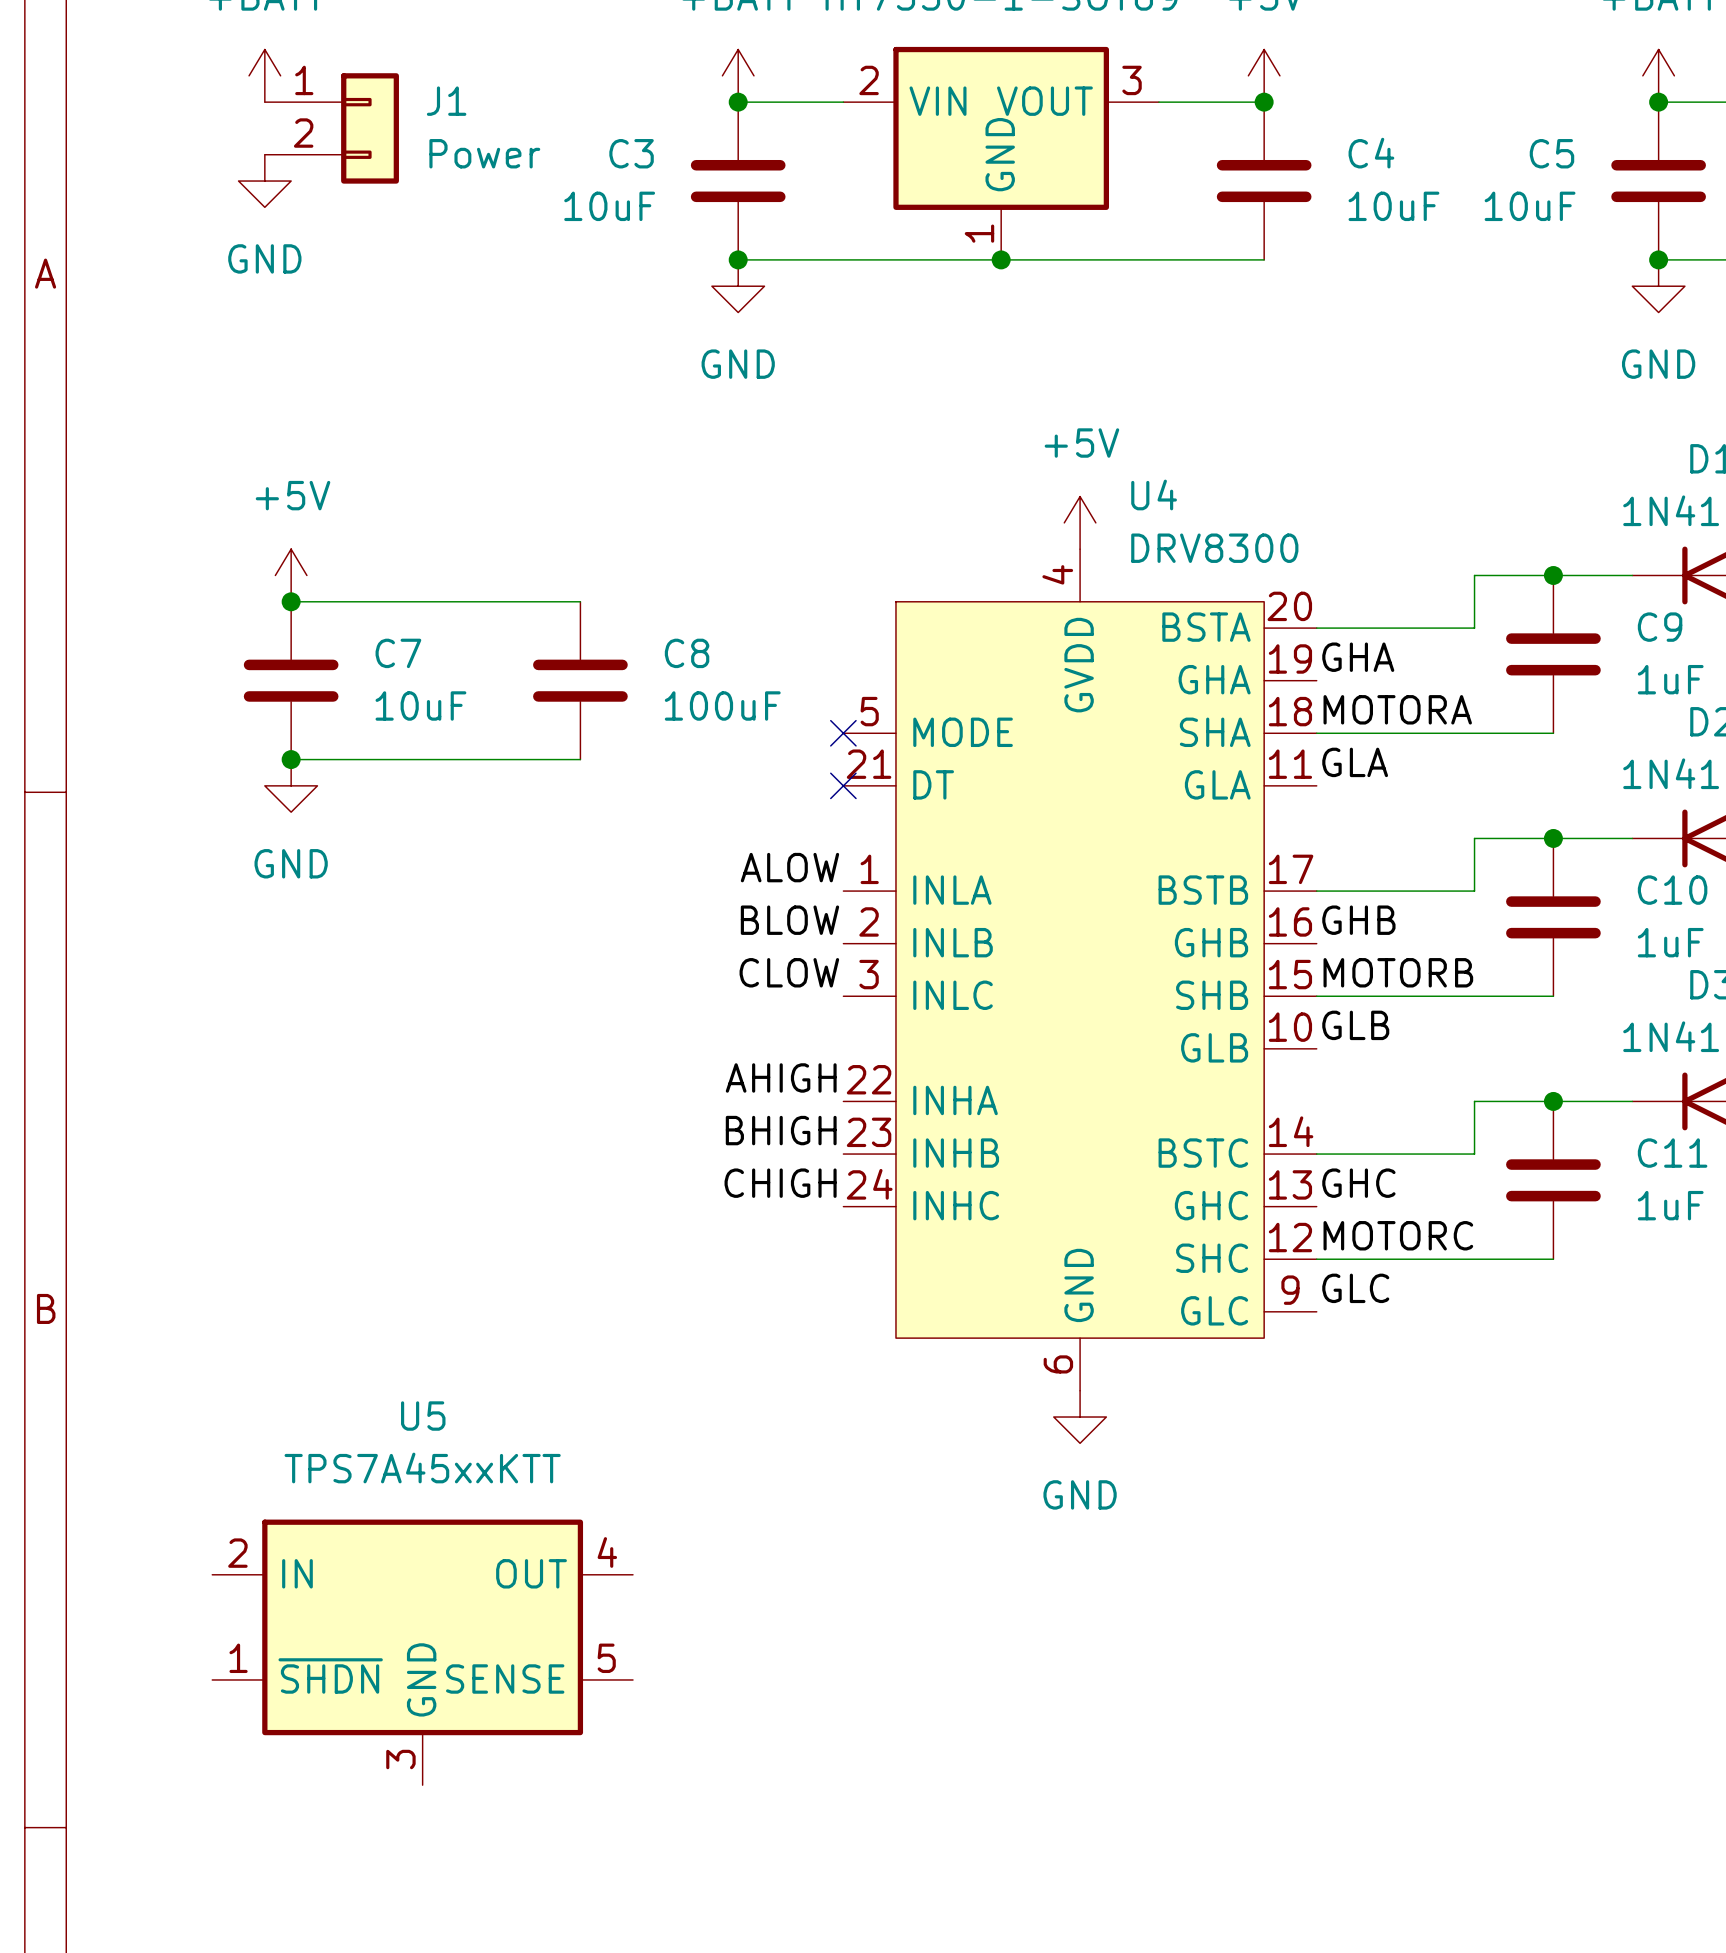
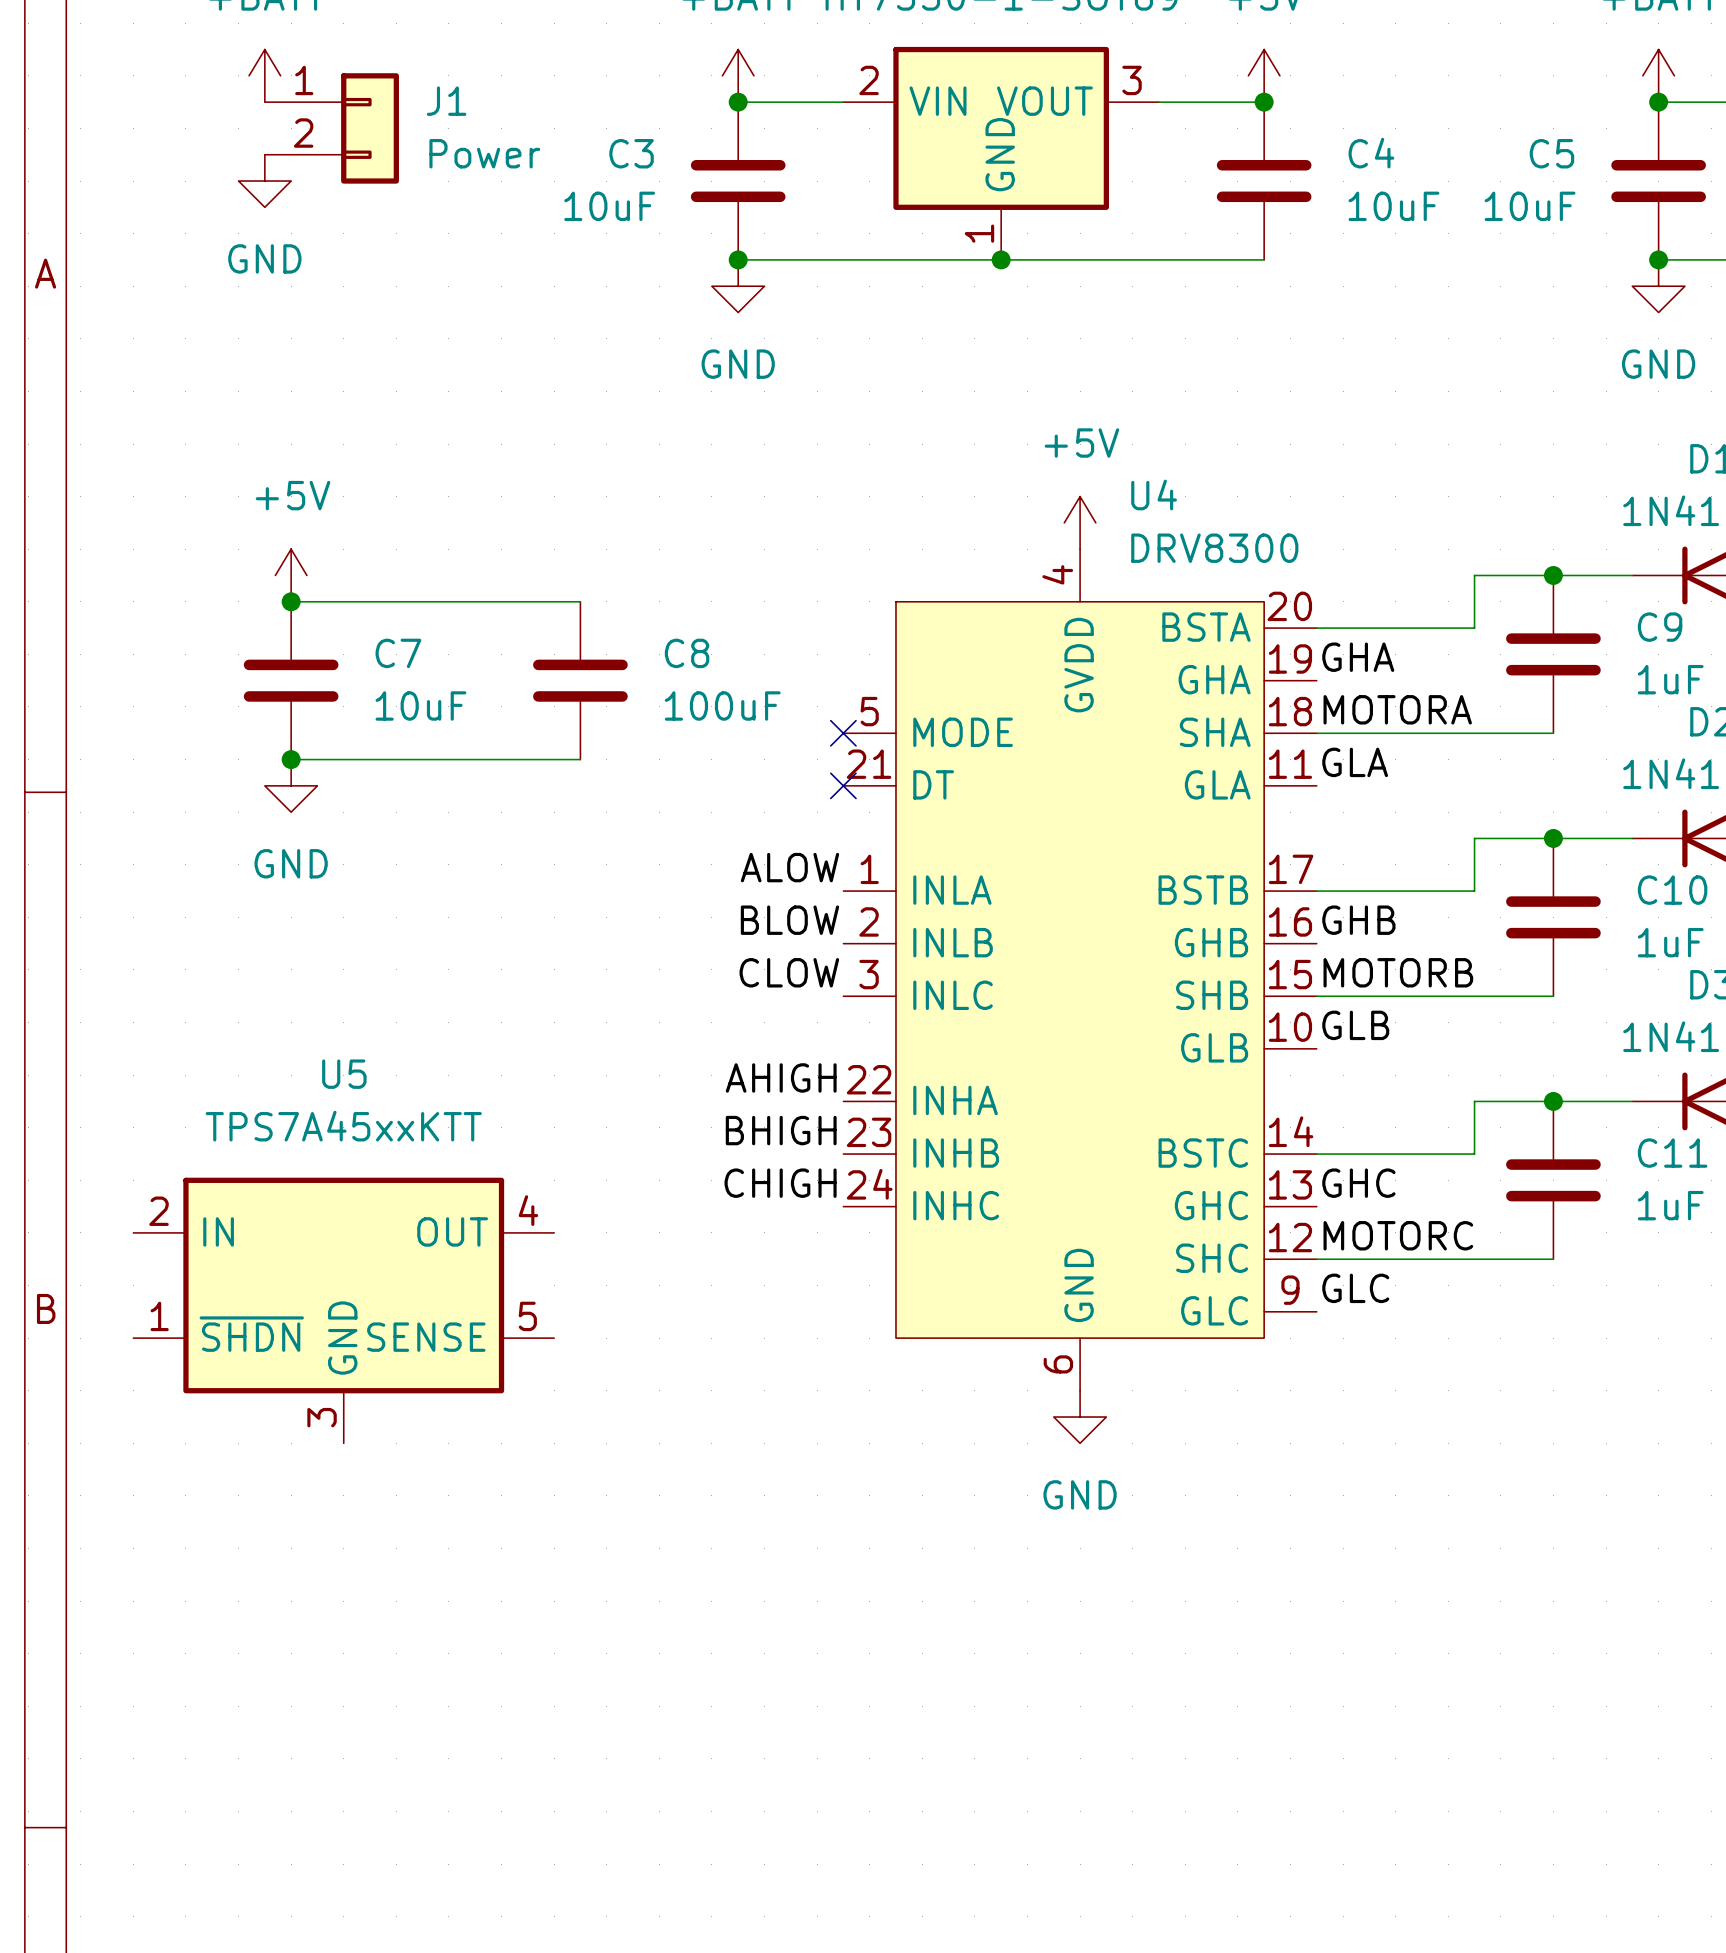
U5 position: (422, 1652) -> (343, 1310)

